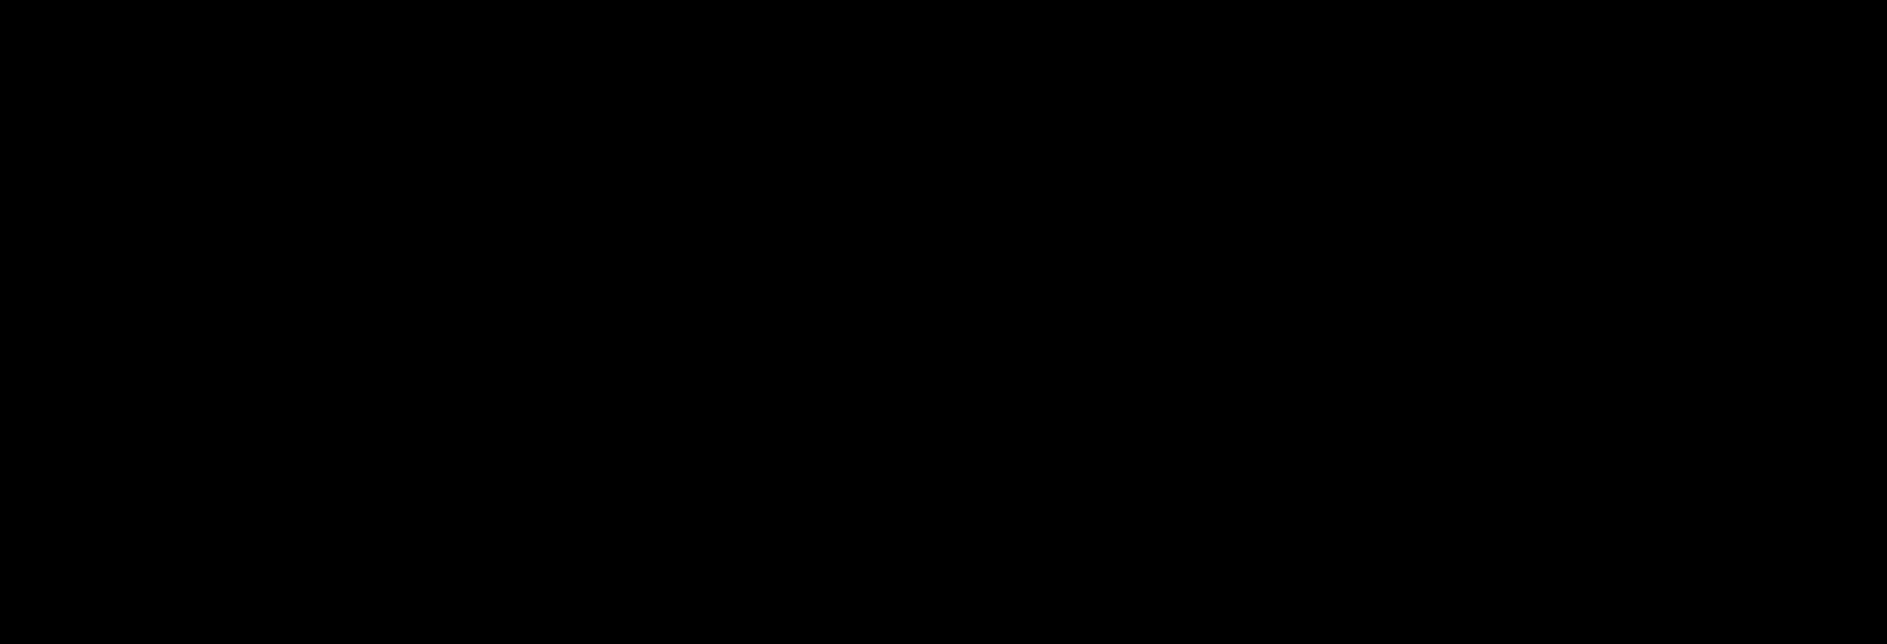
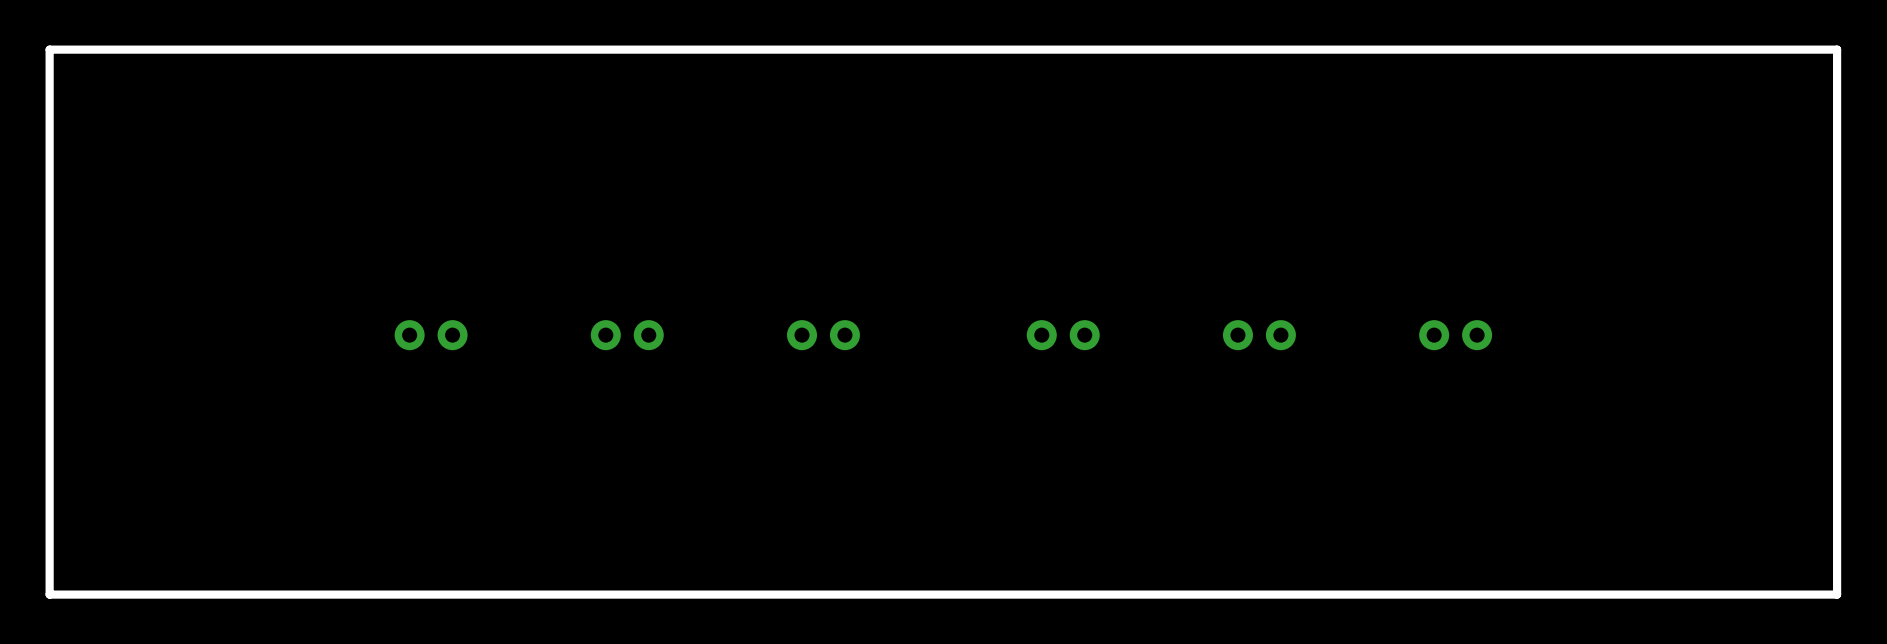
board edge: none -> (1837, 49) (49, 49) (49, 594) (1837, 594) (1837, 49)
part: none -> (431, 335)
part: none -> (627, 335)
part: none -> (823, 335)
part: none -> (1063, 335)
part: none -> (1259, 335)
part: none -> (1455, 335)

